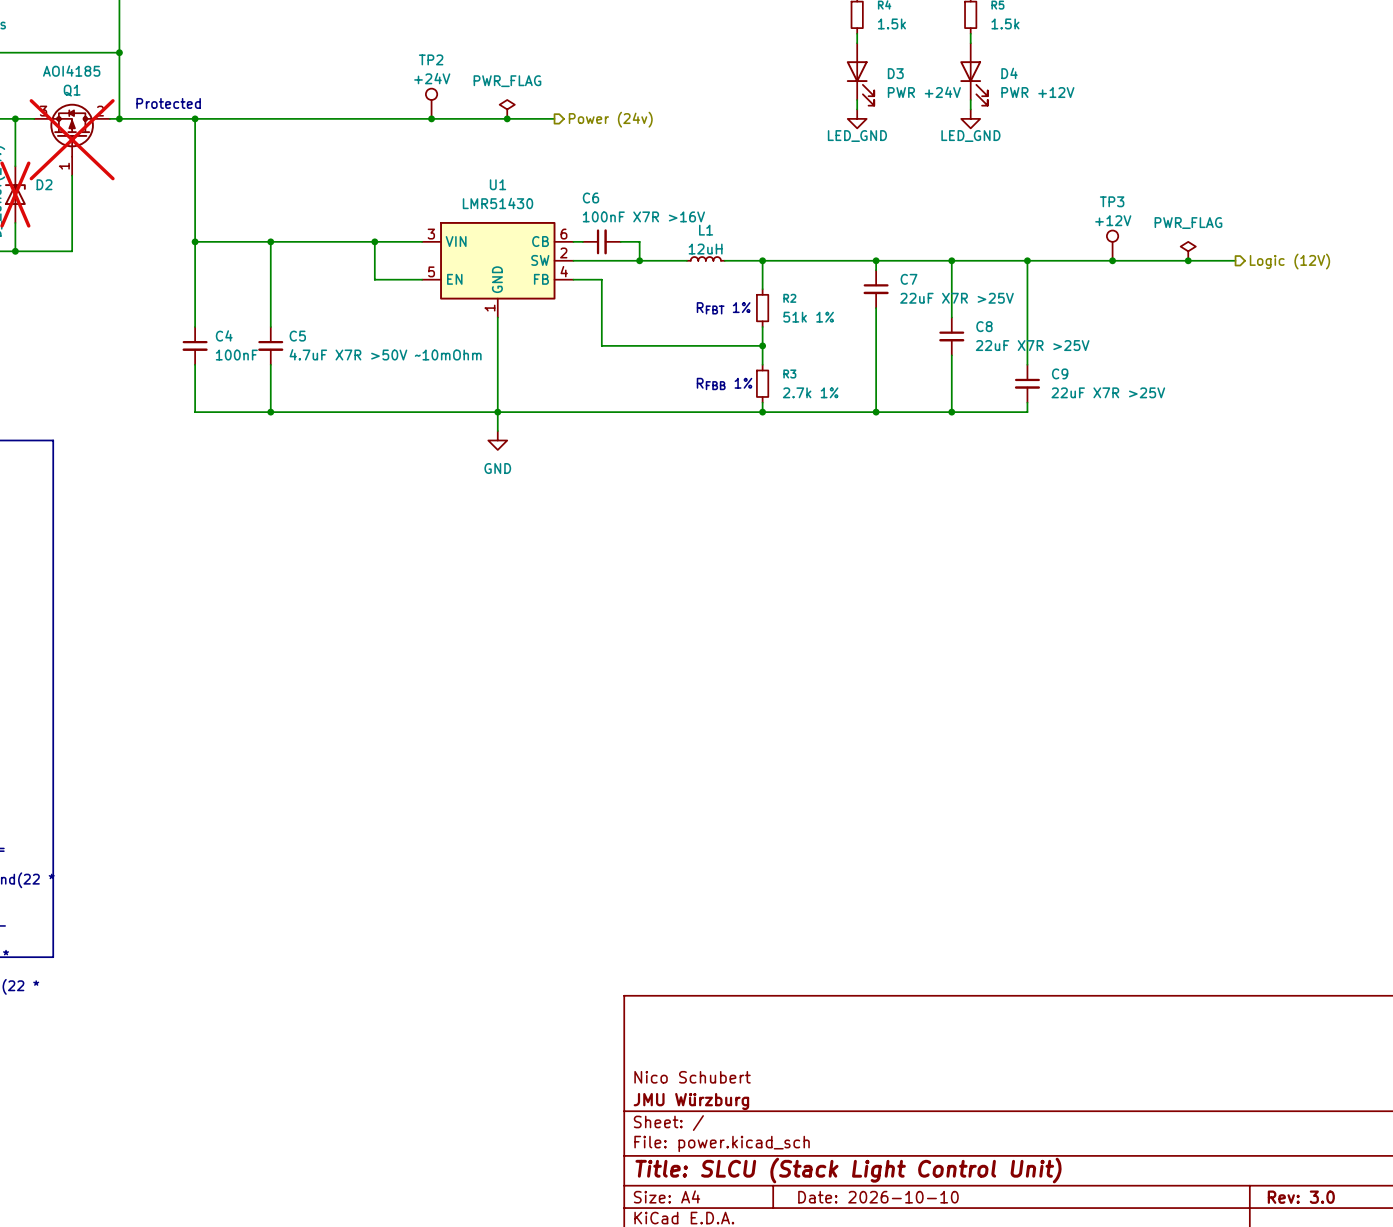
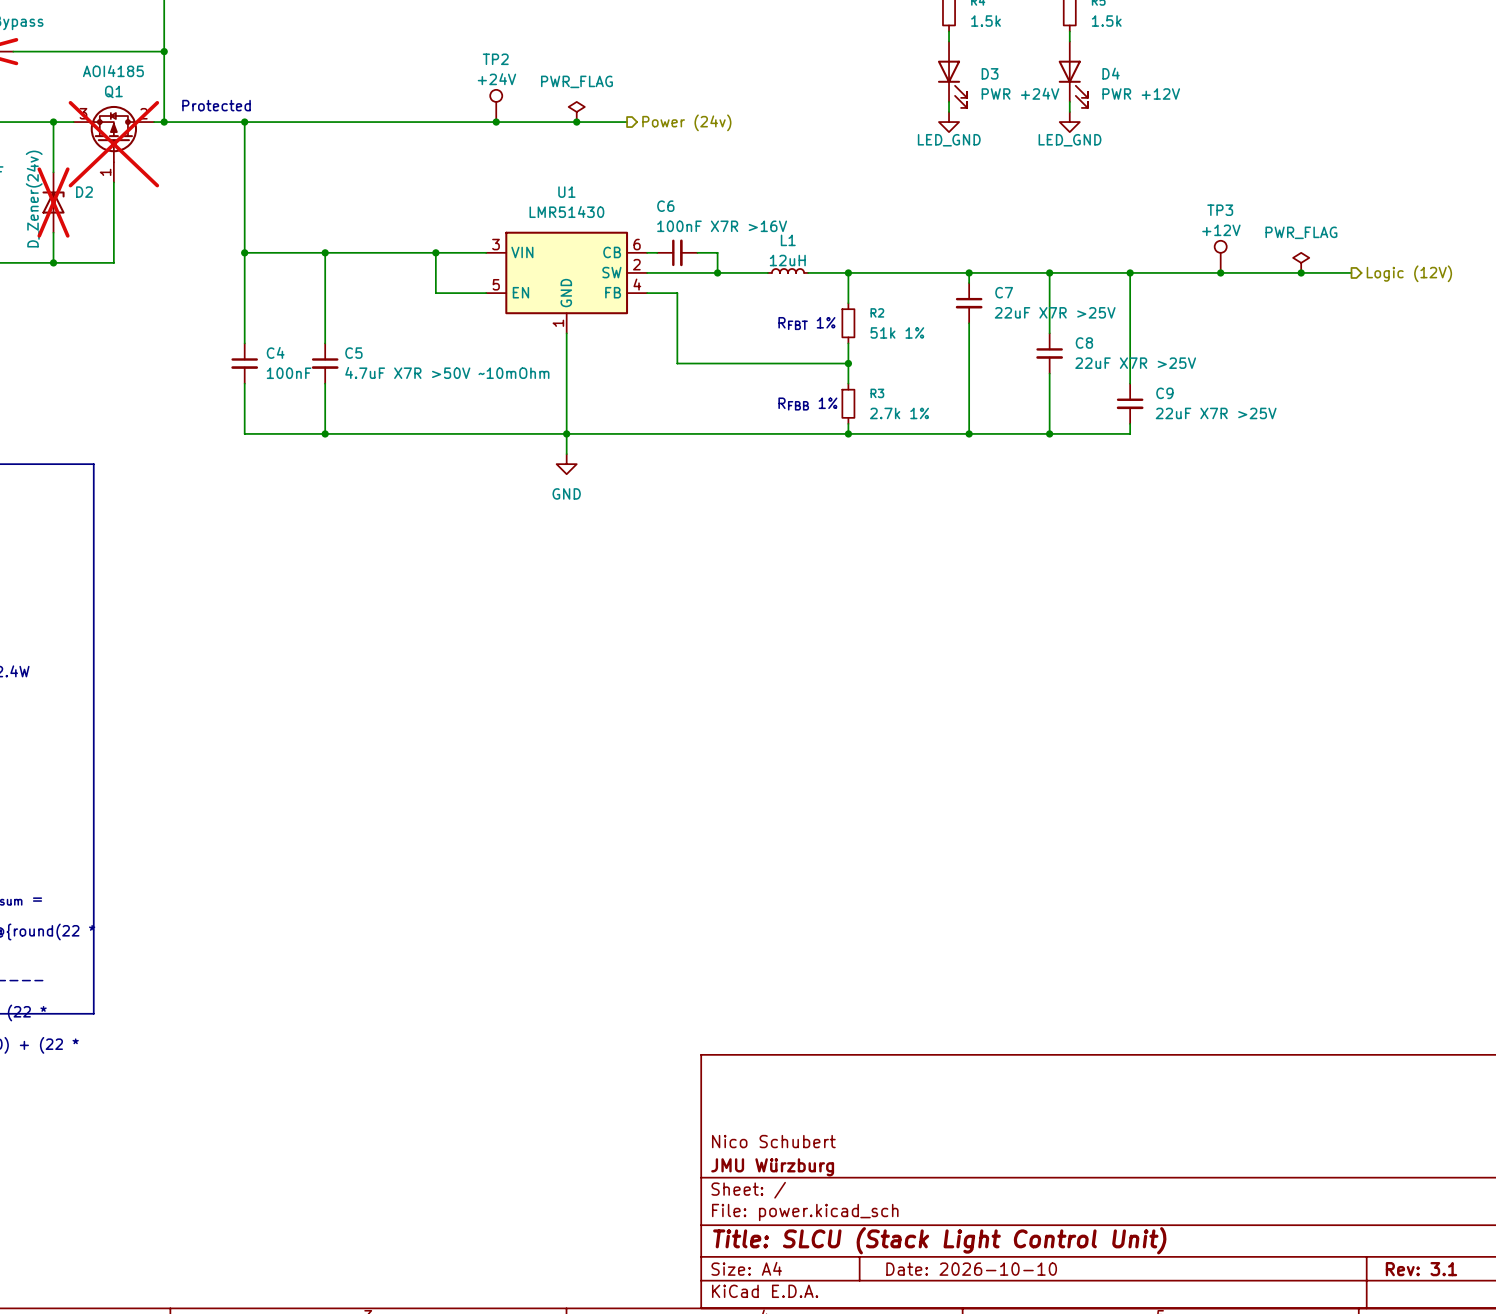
title block: Rev: 3.0 (1301, 1197) -> Rev: 3.1 (1421, 1269)

